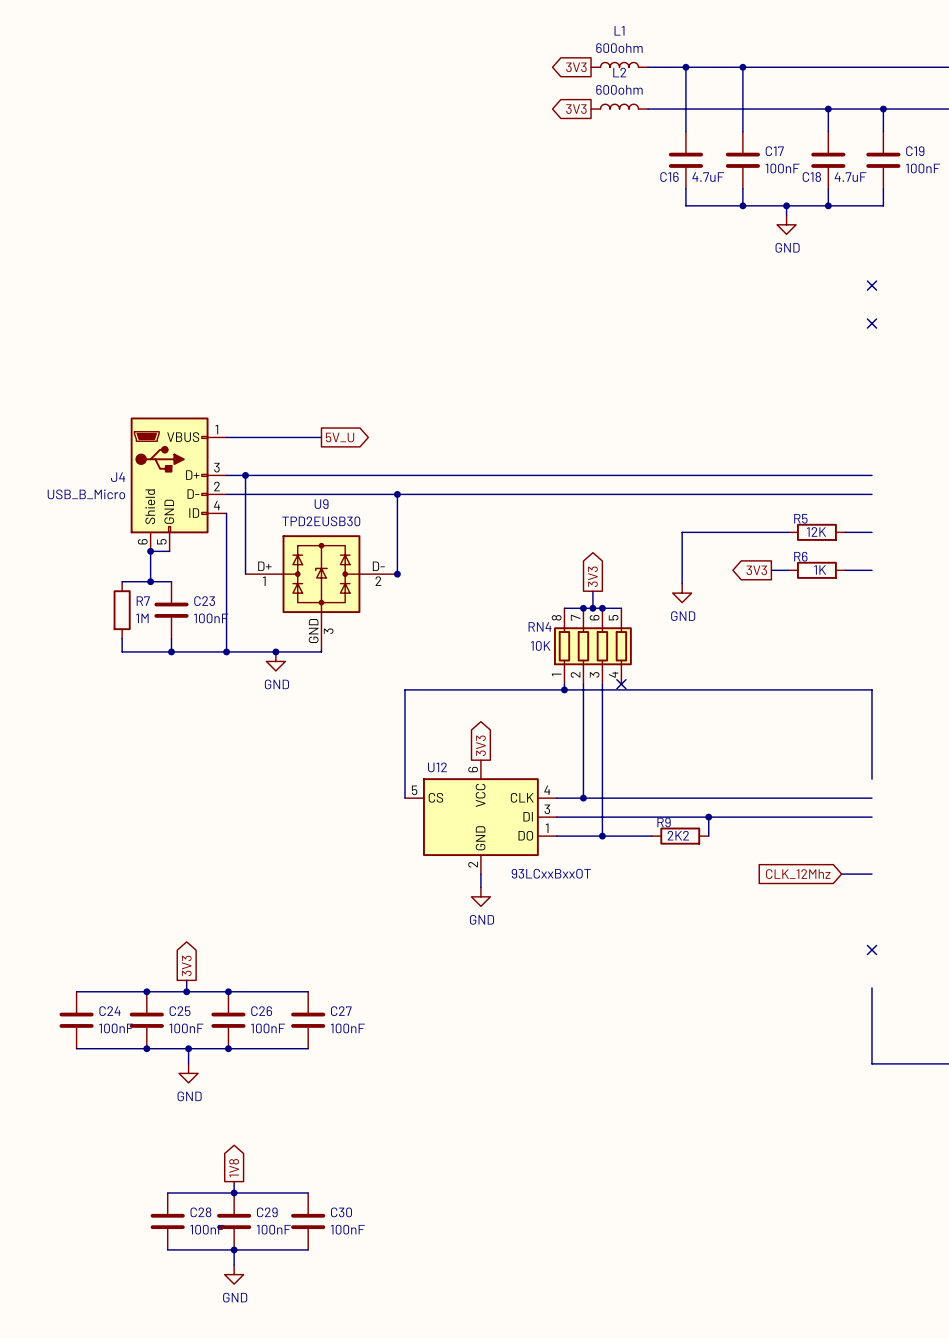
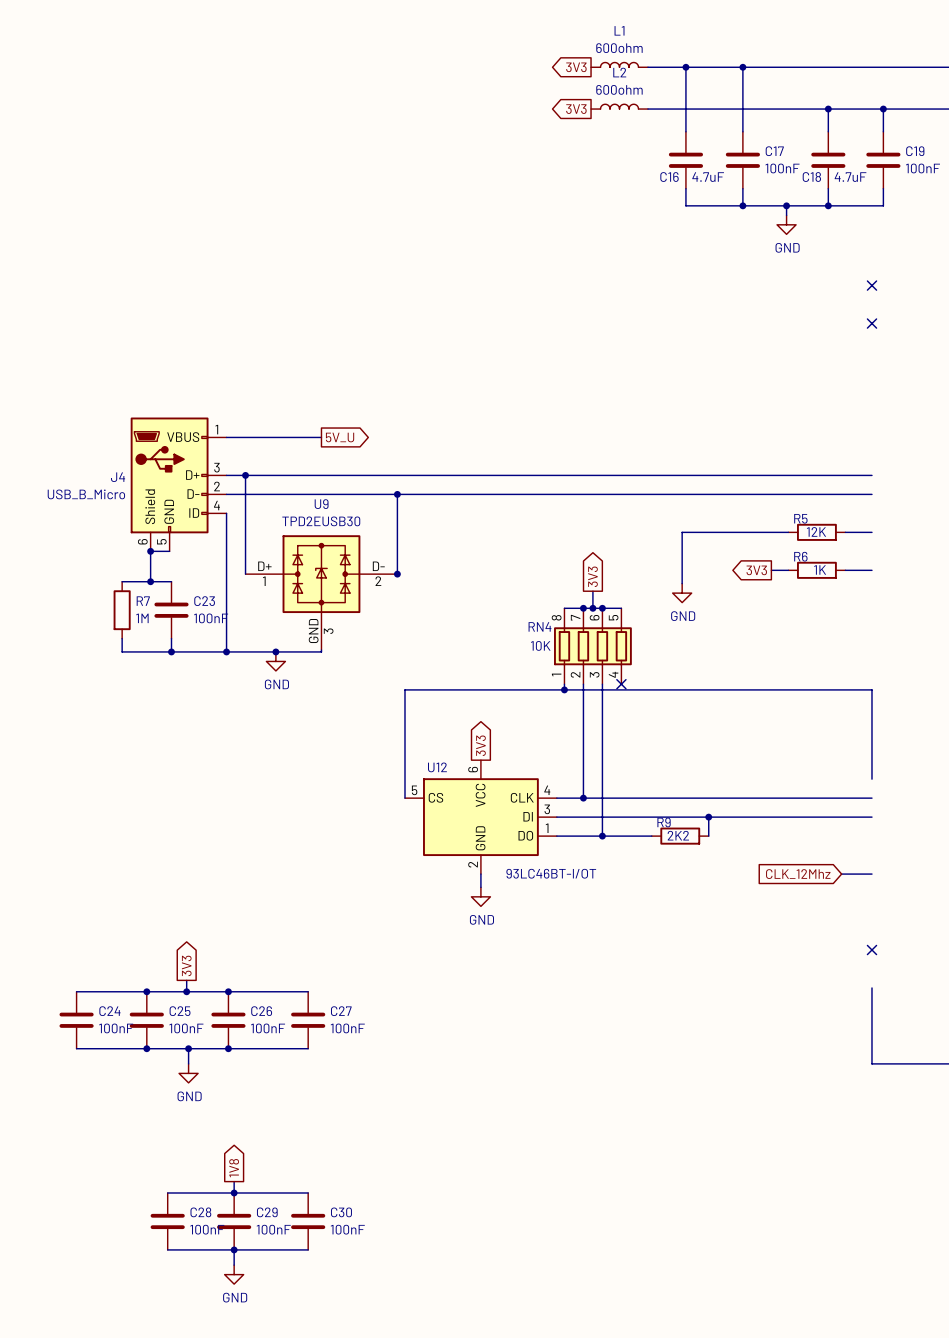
U12 value: 93LCxxBxxOT (551, 873) -> 93LC46BT-I/OT (551, 873)

